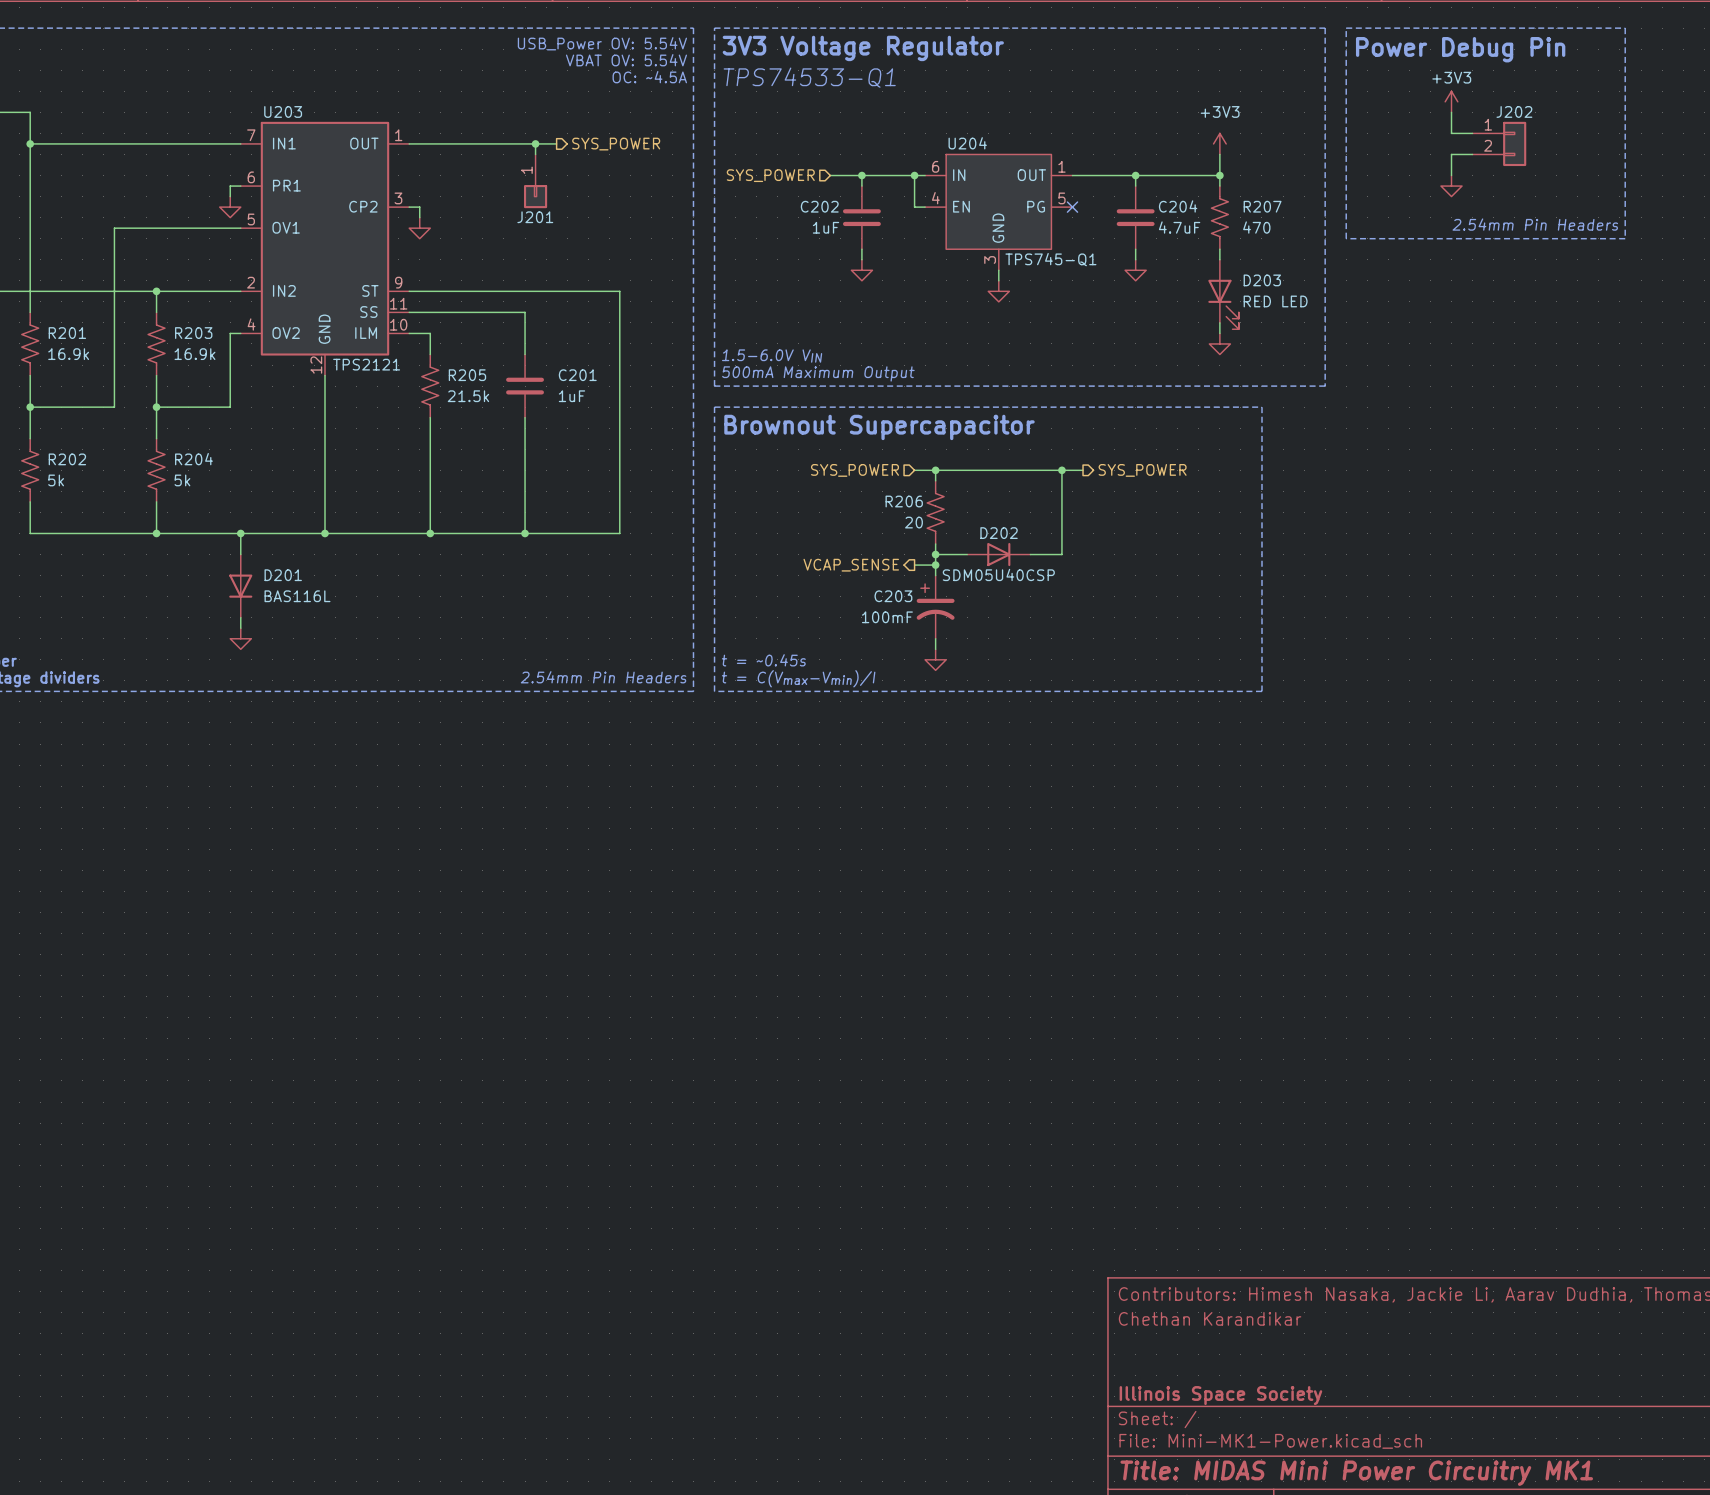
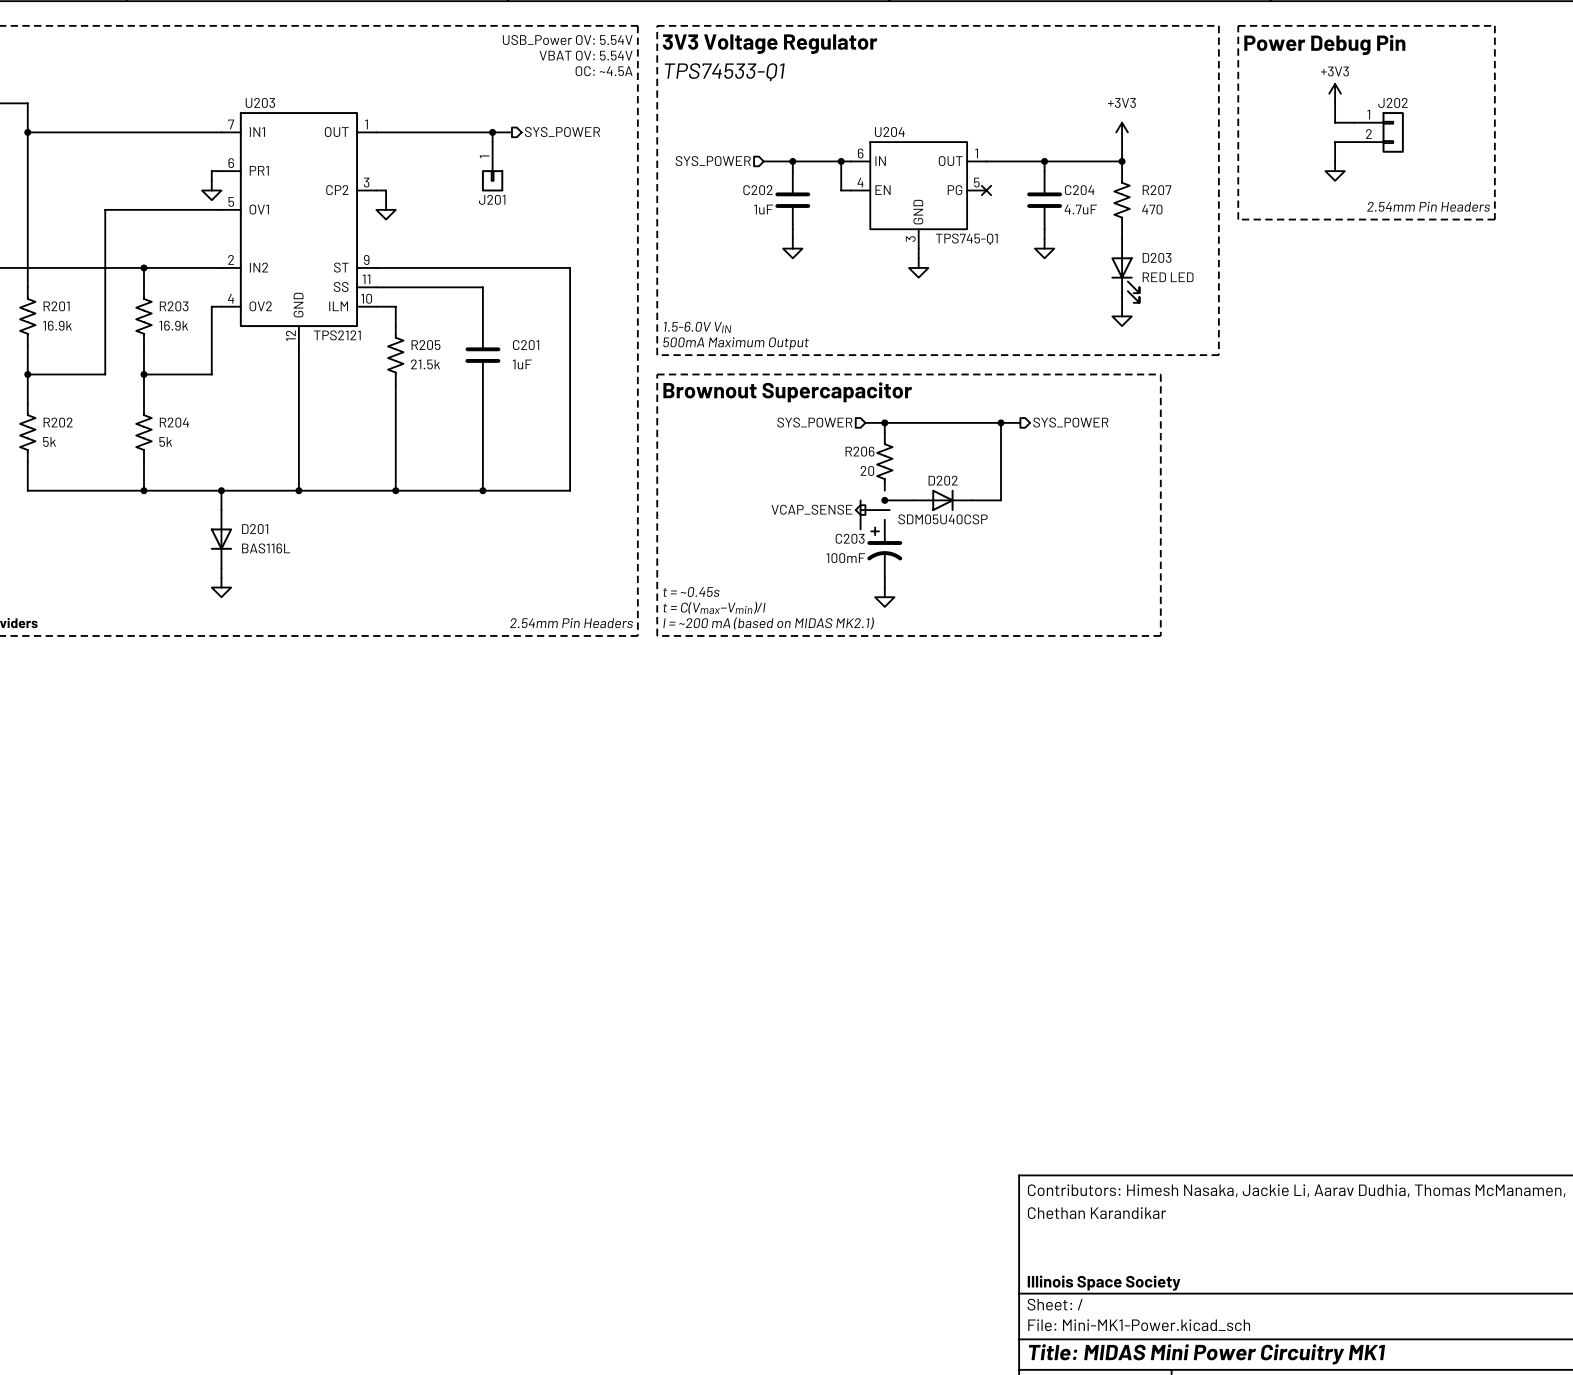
hierarchical label position: SYS_POWER (854, 470) -> SYS_POWER (814, 422)
wire: (914, 470) (1083, 470) -> (865, 422) (1020, 422)
wire: (935, 470) (935, 480) -> (884, 422) (884, 432)
junction position: (935, 470) -> (884, 422)
wire: (1061, 470) (1061, 554) (1030, 554) -> (1001, 422) (1001, 500) (971, 500)
junction position: (1061, 470) -> (1001, 422)
hierarchical label position: SYS_POWER (1142, 470) -> SYS_POWER (1070, 422)
R206 position: (935, 512) -> (884, 461)
wire: none -> (884, 500) (913, 500)
junction: none -> (884, 500)
junction: (935, 554) -> none
D202 position: (998, 554) -> (942, 500)
hierarchical label position: VCAP_SENSE (851, 565) -> VCAP_SENSE (811, 509)
wire: (914, 565) (935, 565) -> none
junction: (935, 565) -> none
C203 position: (935, 607) -> (884, 548)
wire: (935, 638) (935, 649) -> (884, 577) (884, 587)
text: none -> t = ~0.45s (691, 592)
power symbol position: (935, 659) -> (884, 597)
text: t = ~0.45s (763, 660) -> t = C(Vmax−Vmin)/I (714, 607)
text: t = C(Vmax−Vmin)/I (798, 678) -> I = ~200 mA (based on MIDAS MK2.1) (768, 623)

